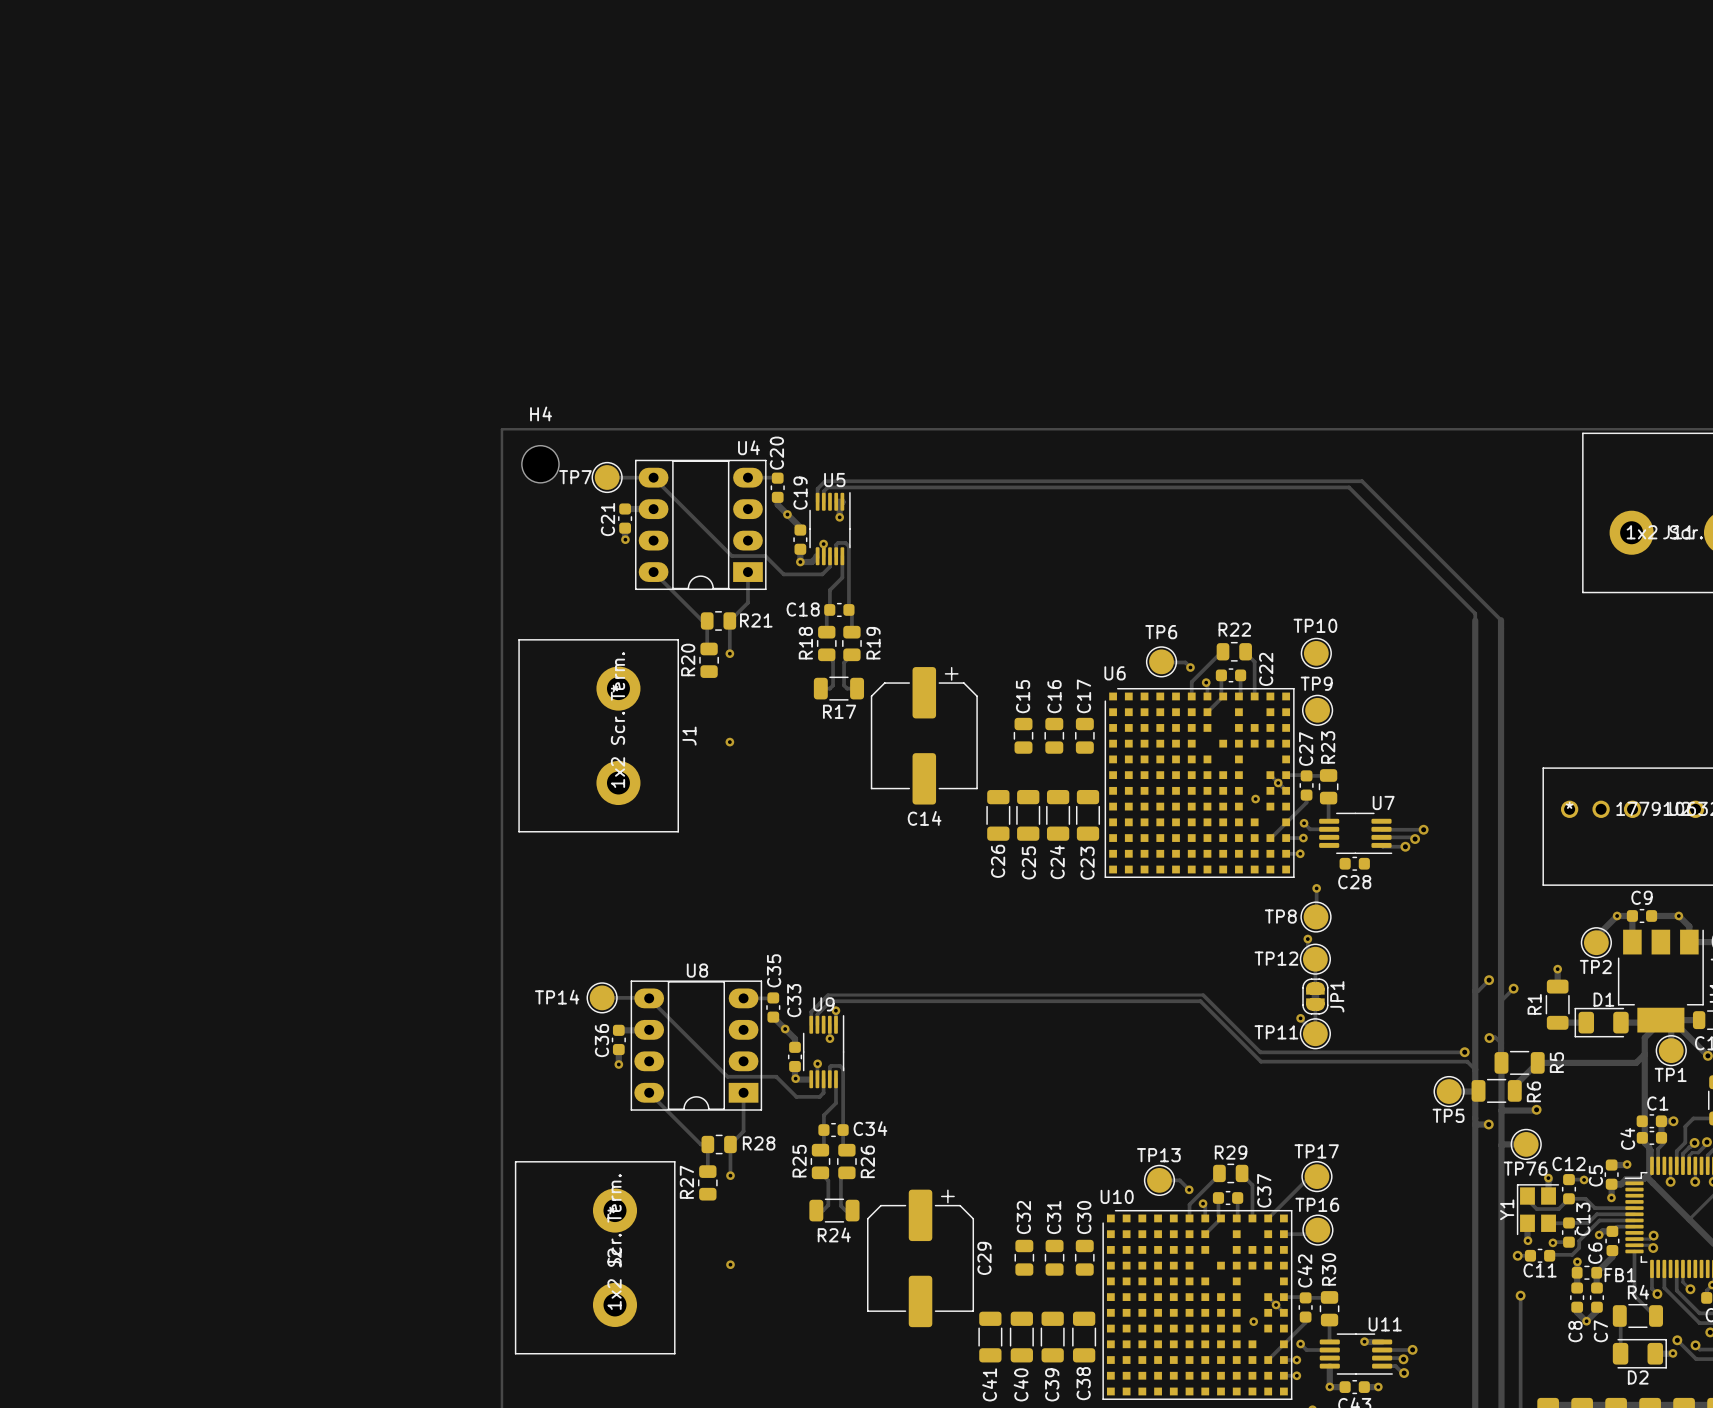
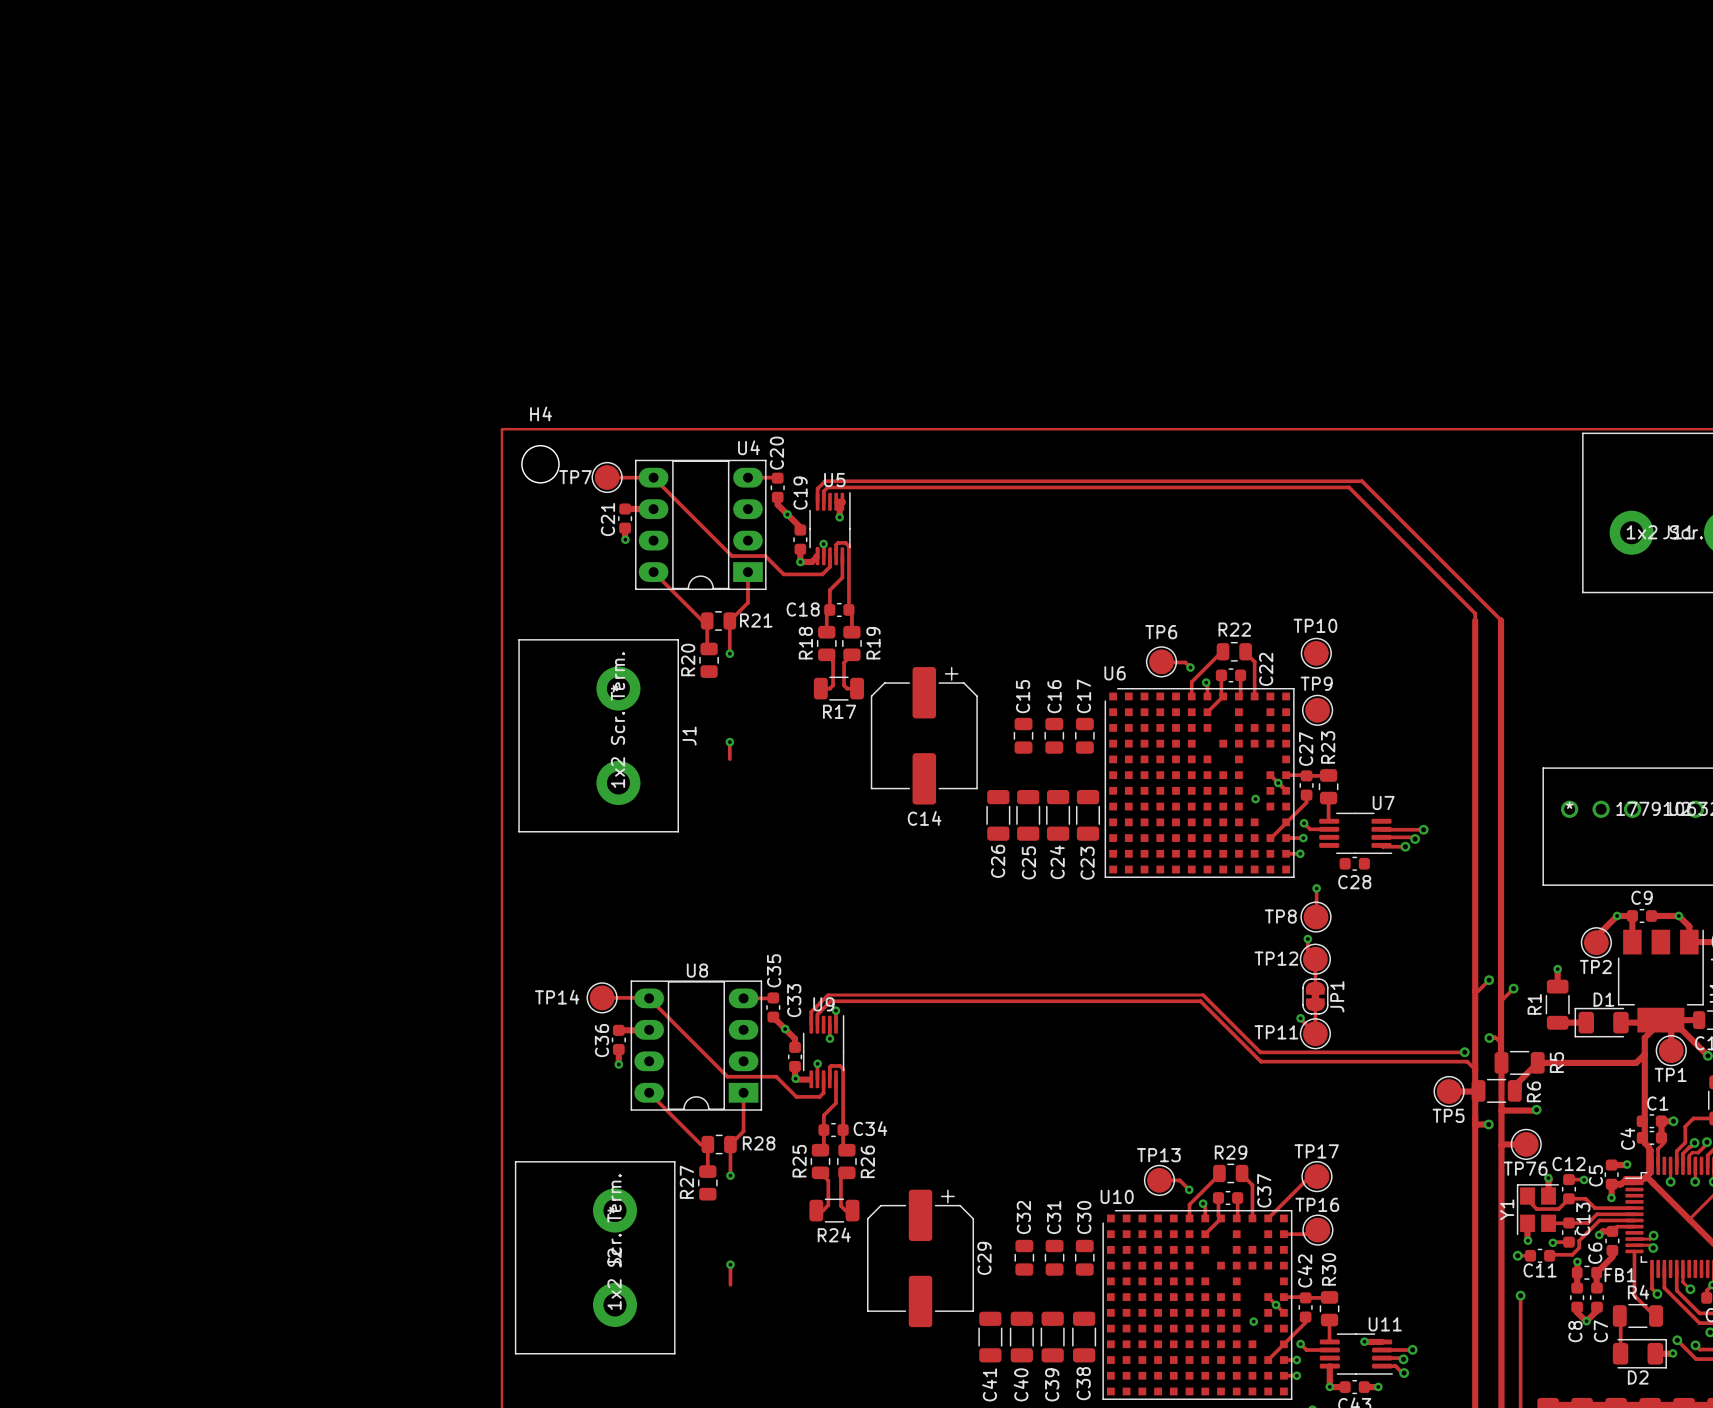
track: none -> (729, 742) (729, 759)
track: none -> (730, 1264) (730, 1284)

